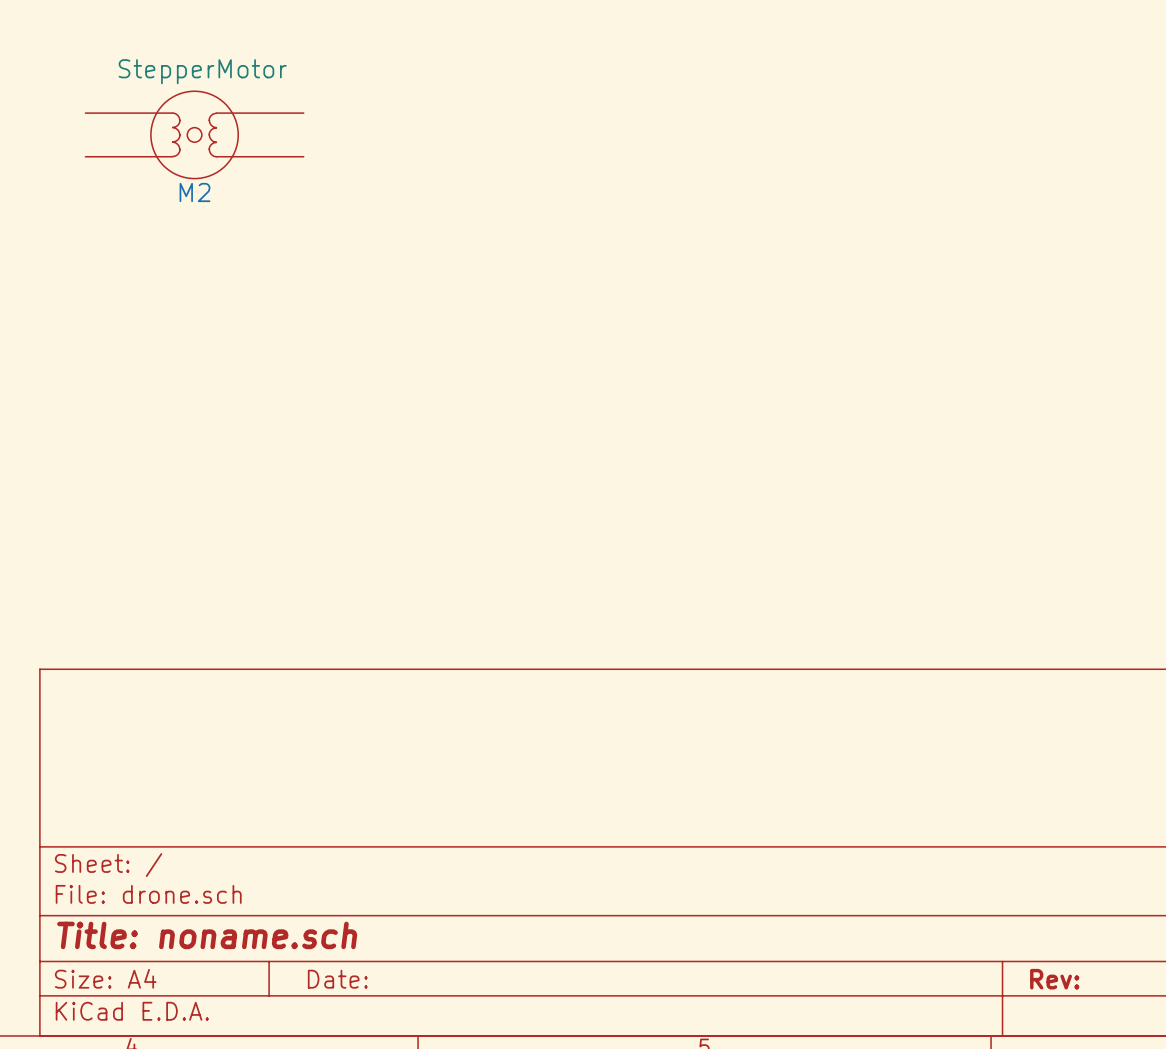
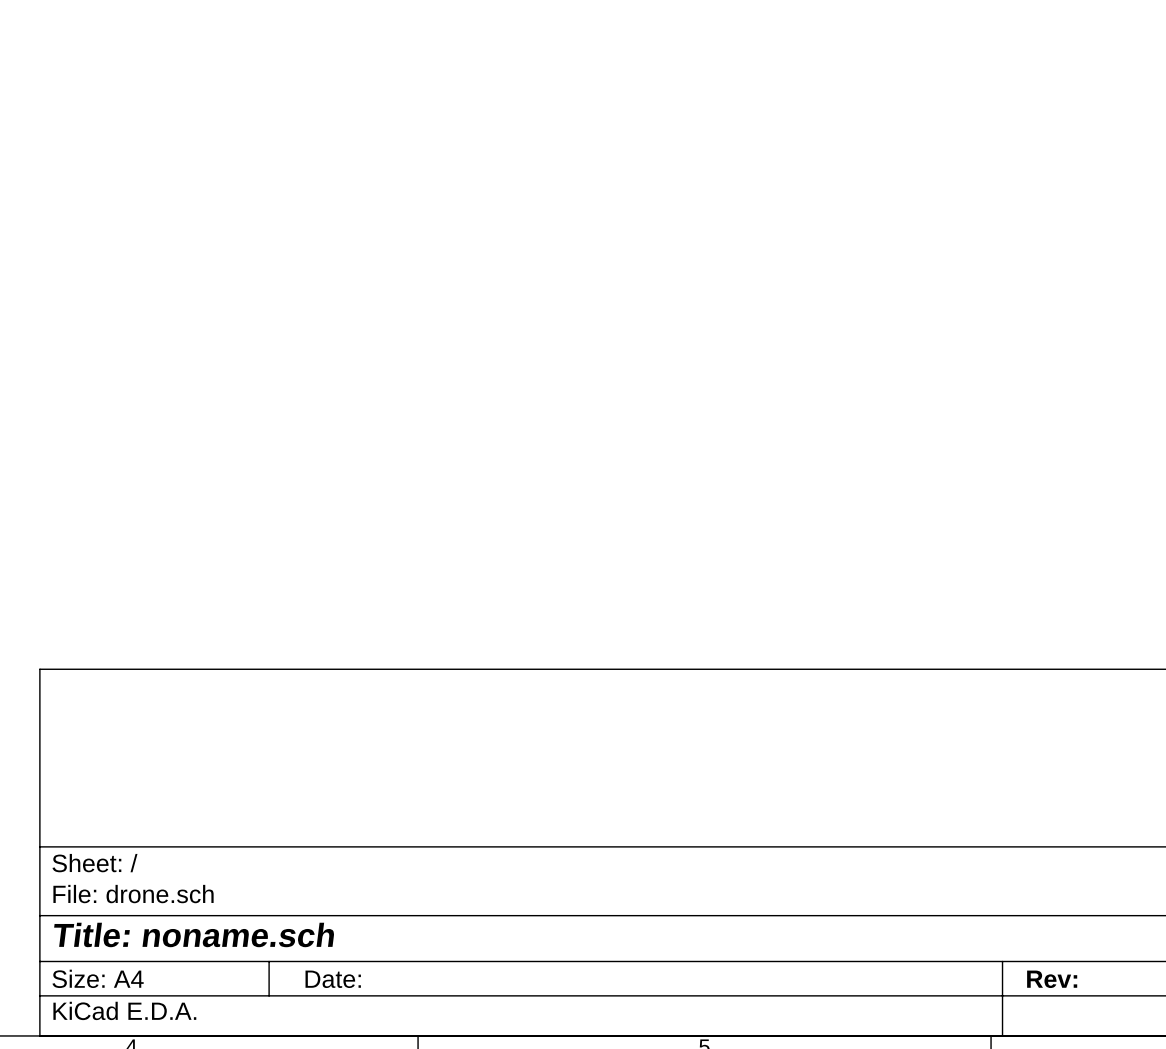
M2: StepperMotor (194, 134) -> none

